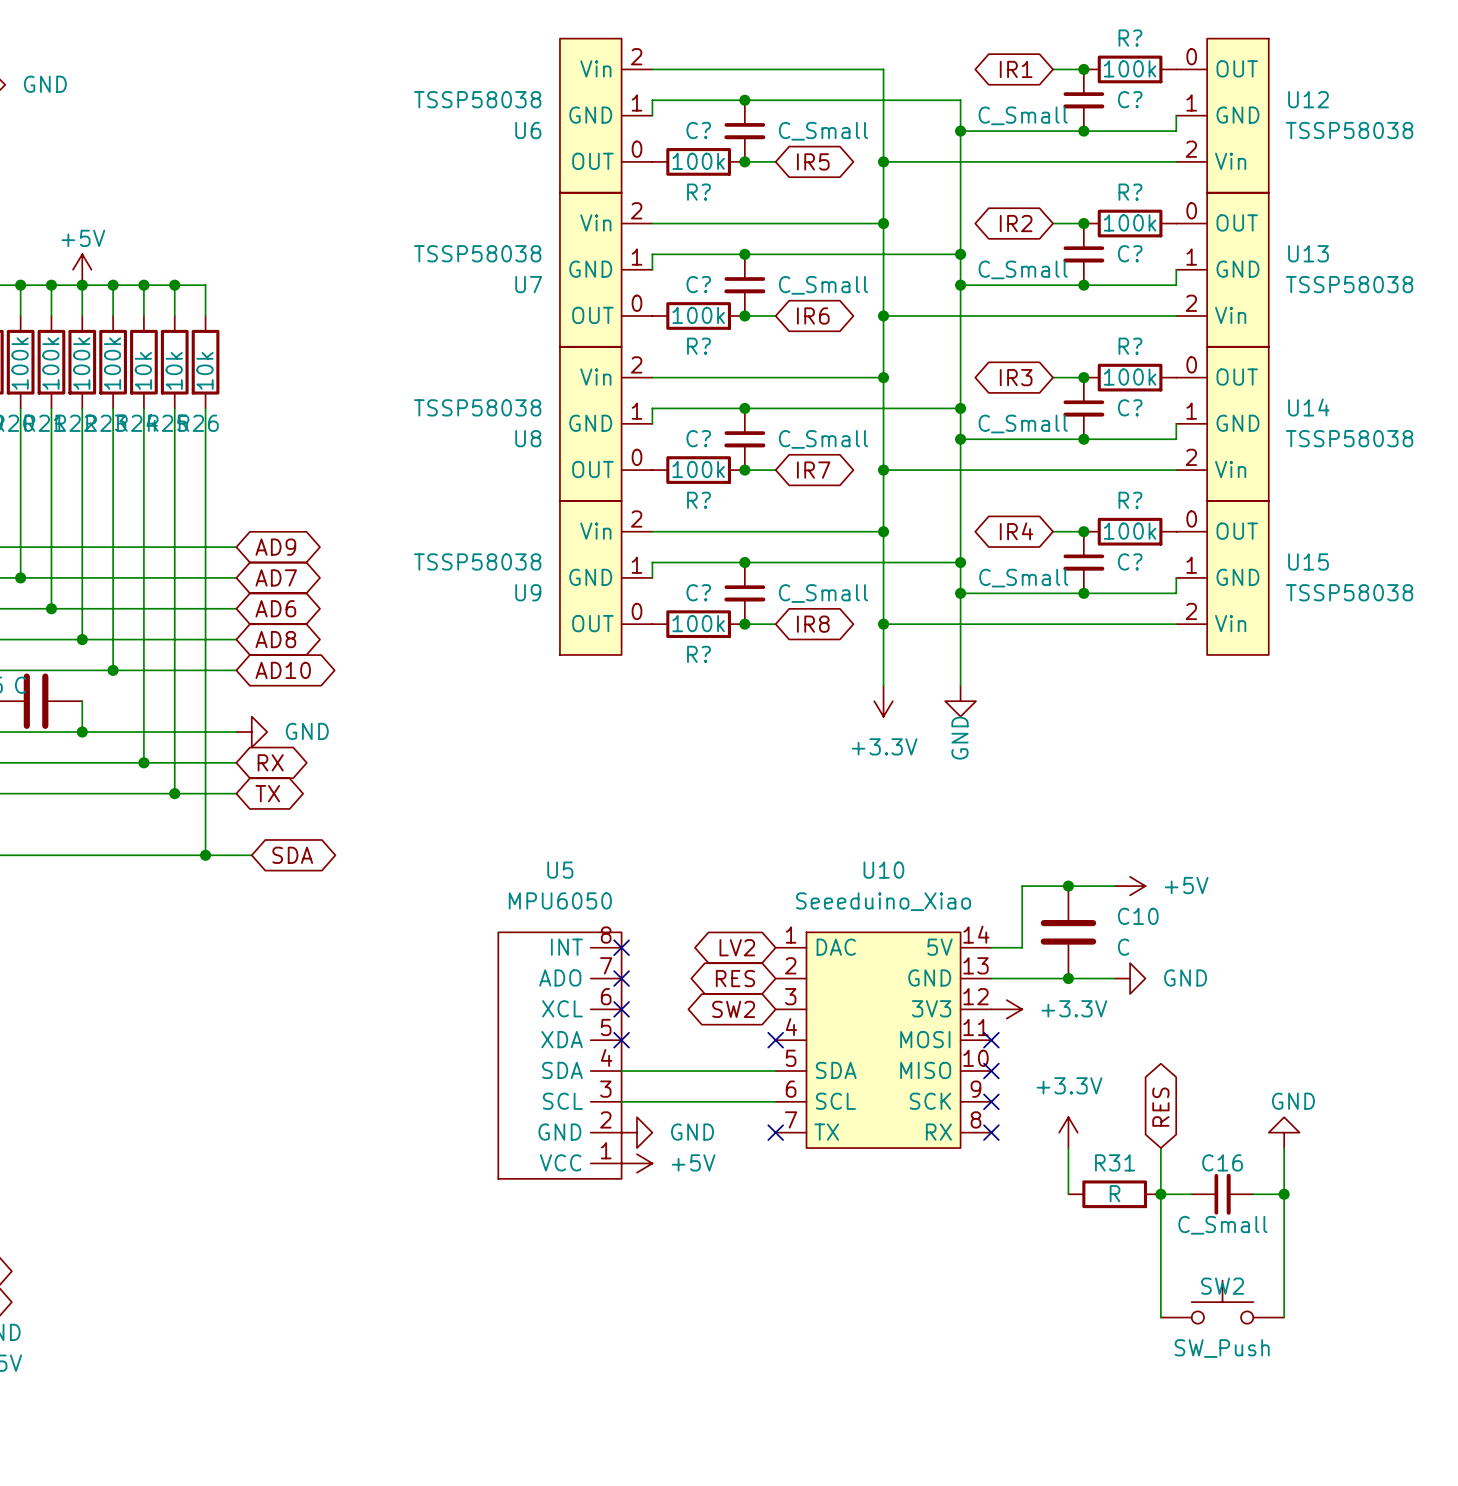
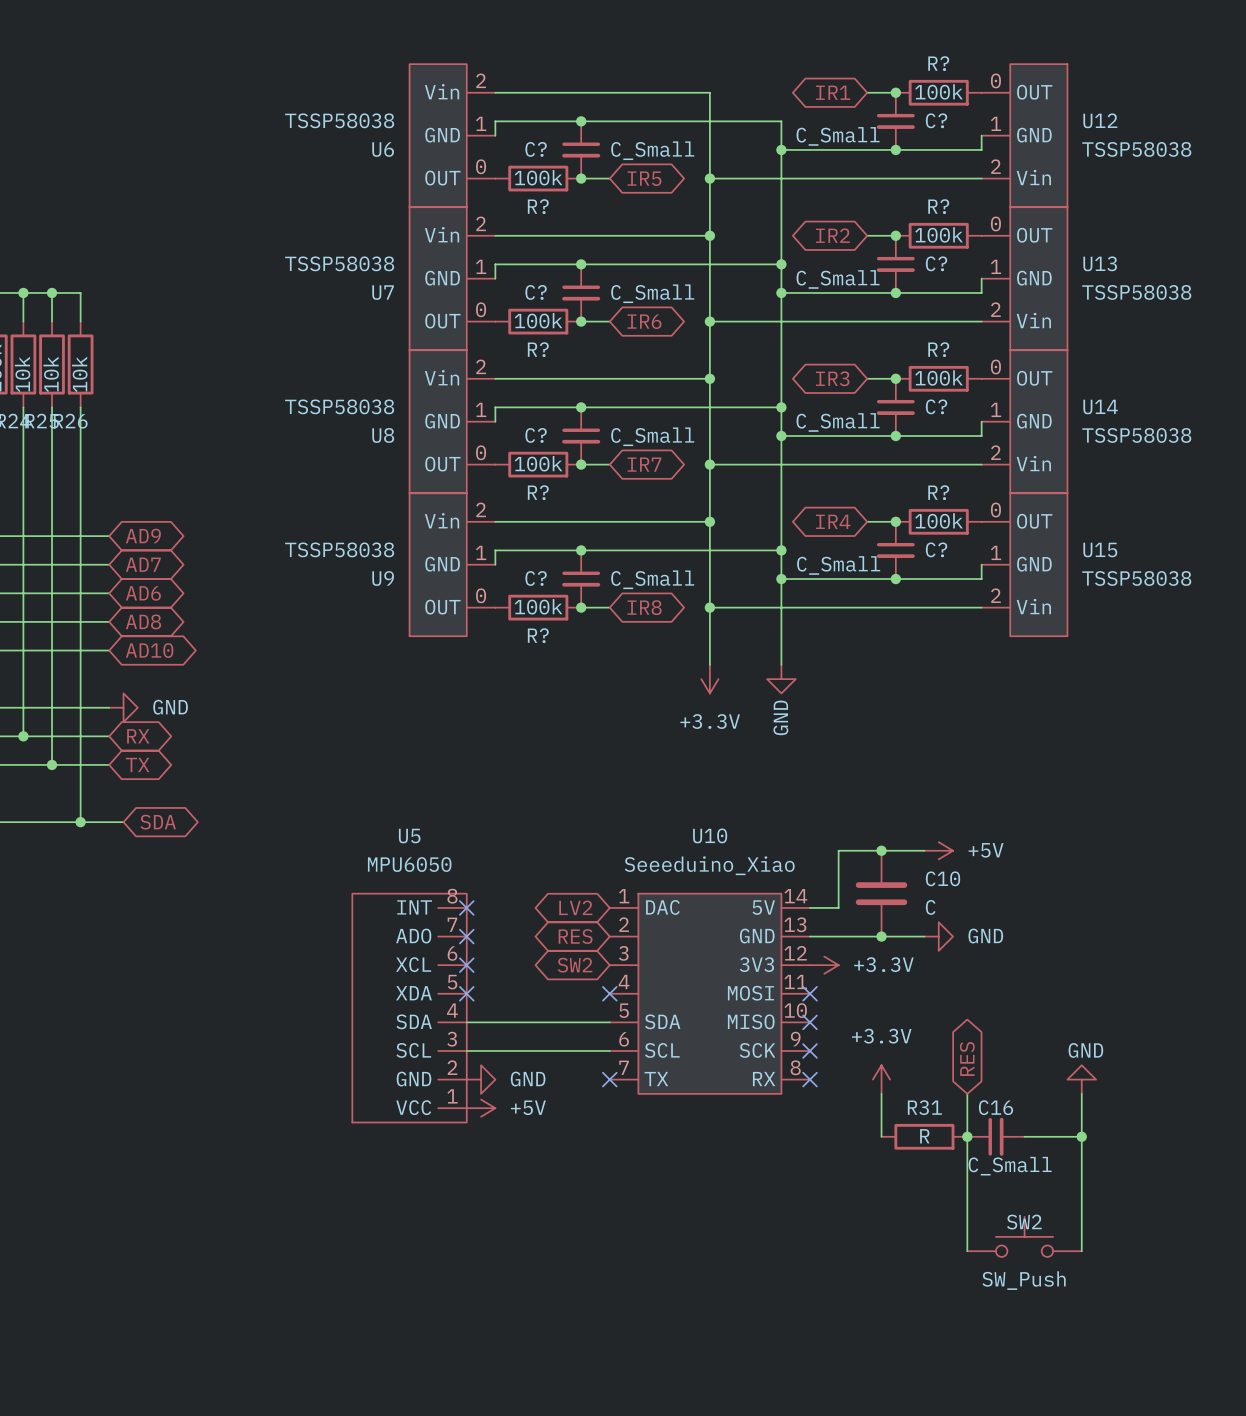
C16 position: (1222, 1194) -> (995, 1136)
C16 value position: C_Small (1222, 1225) -> C_Small (1010, 1166)

